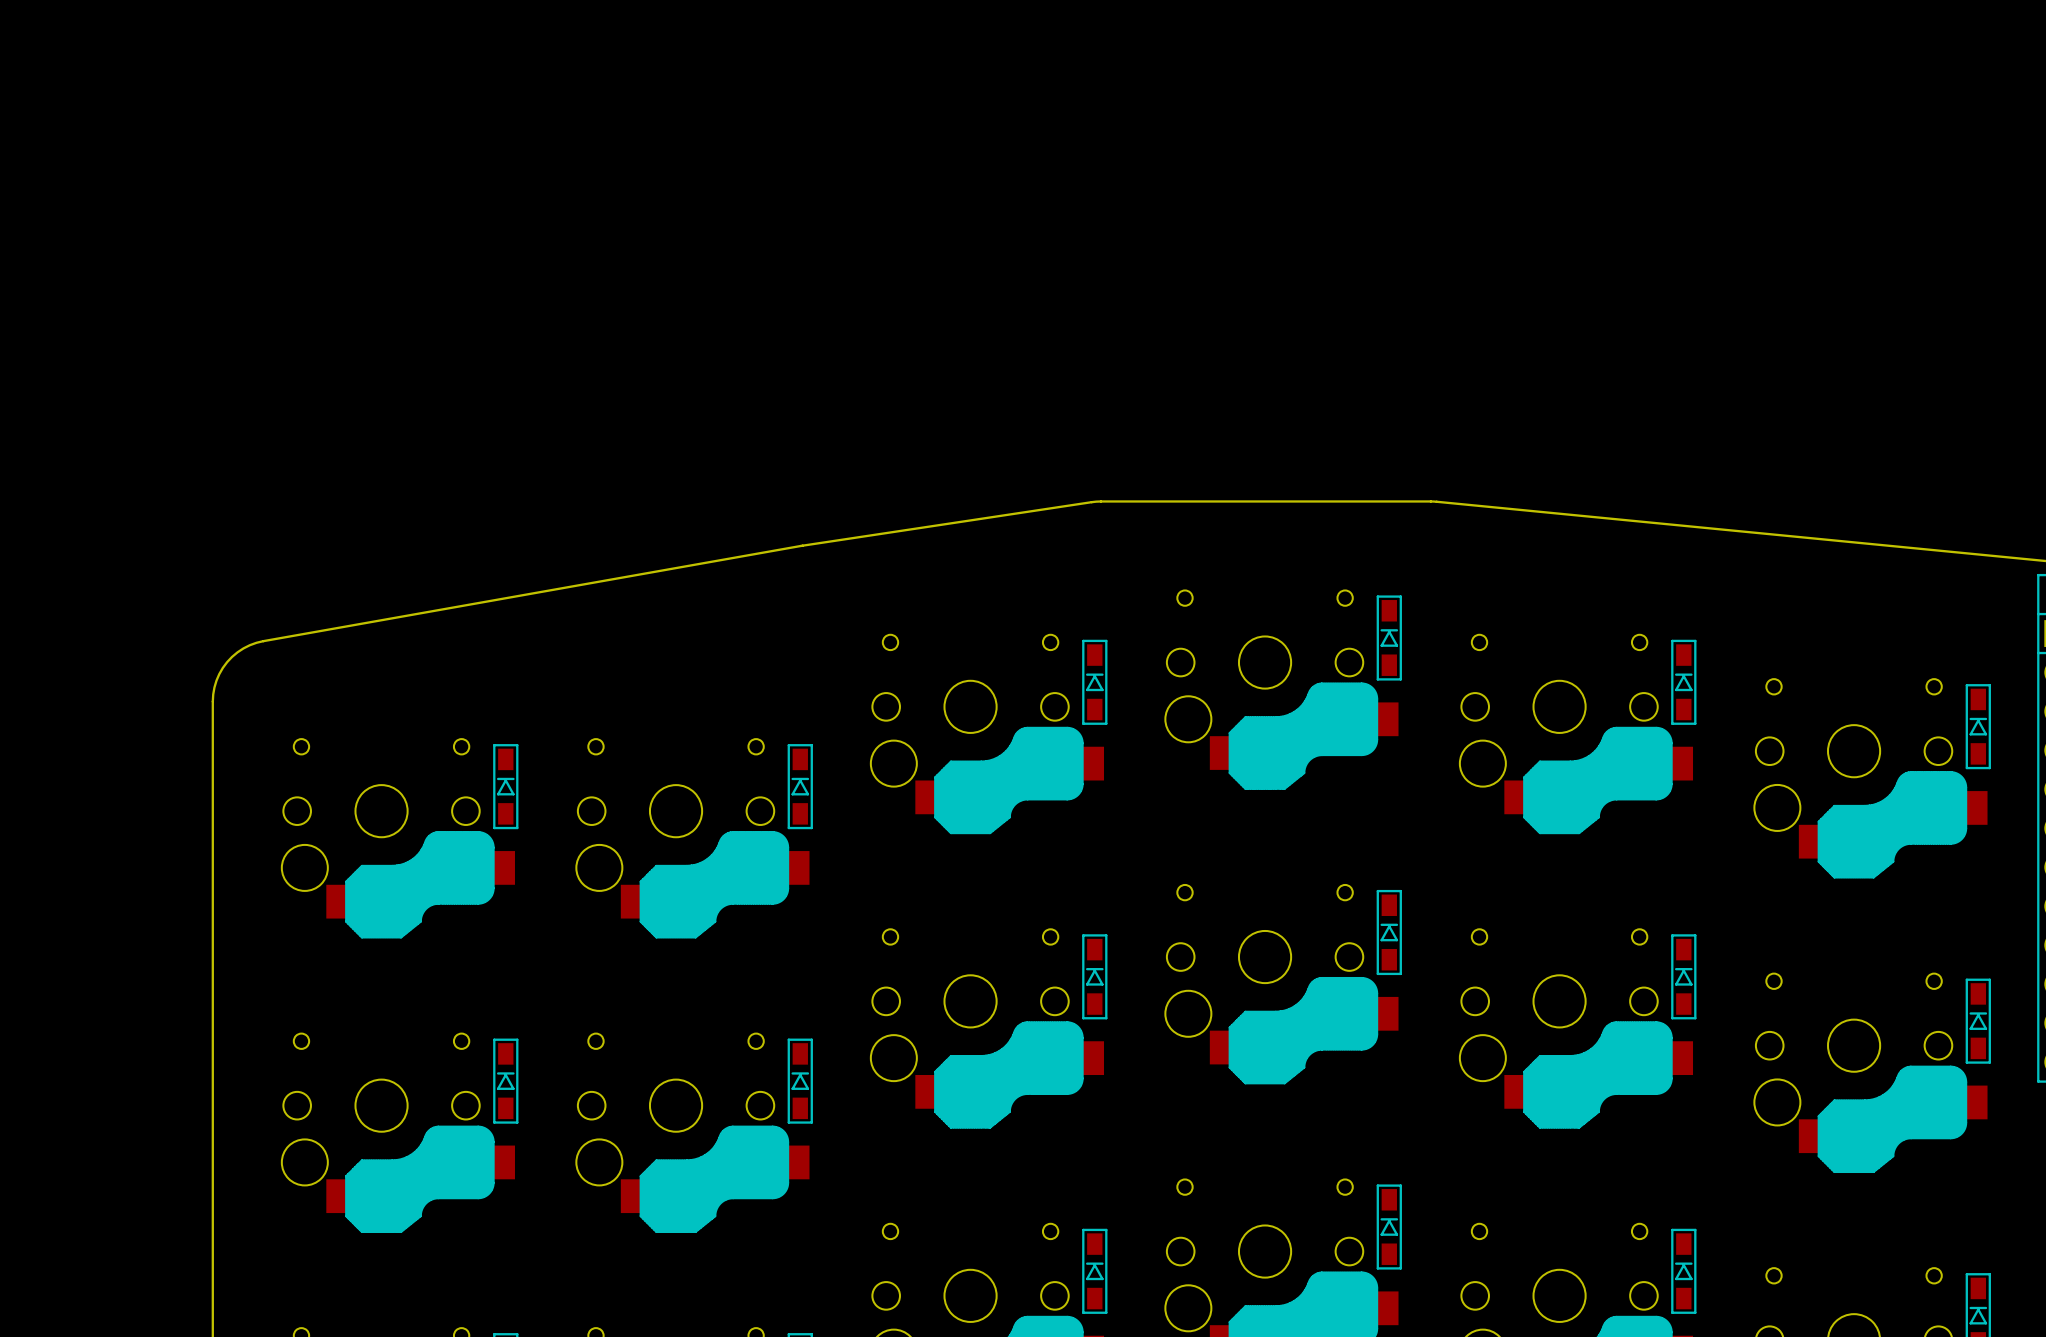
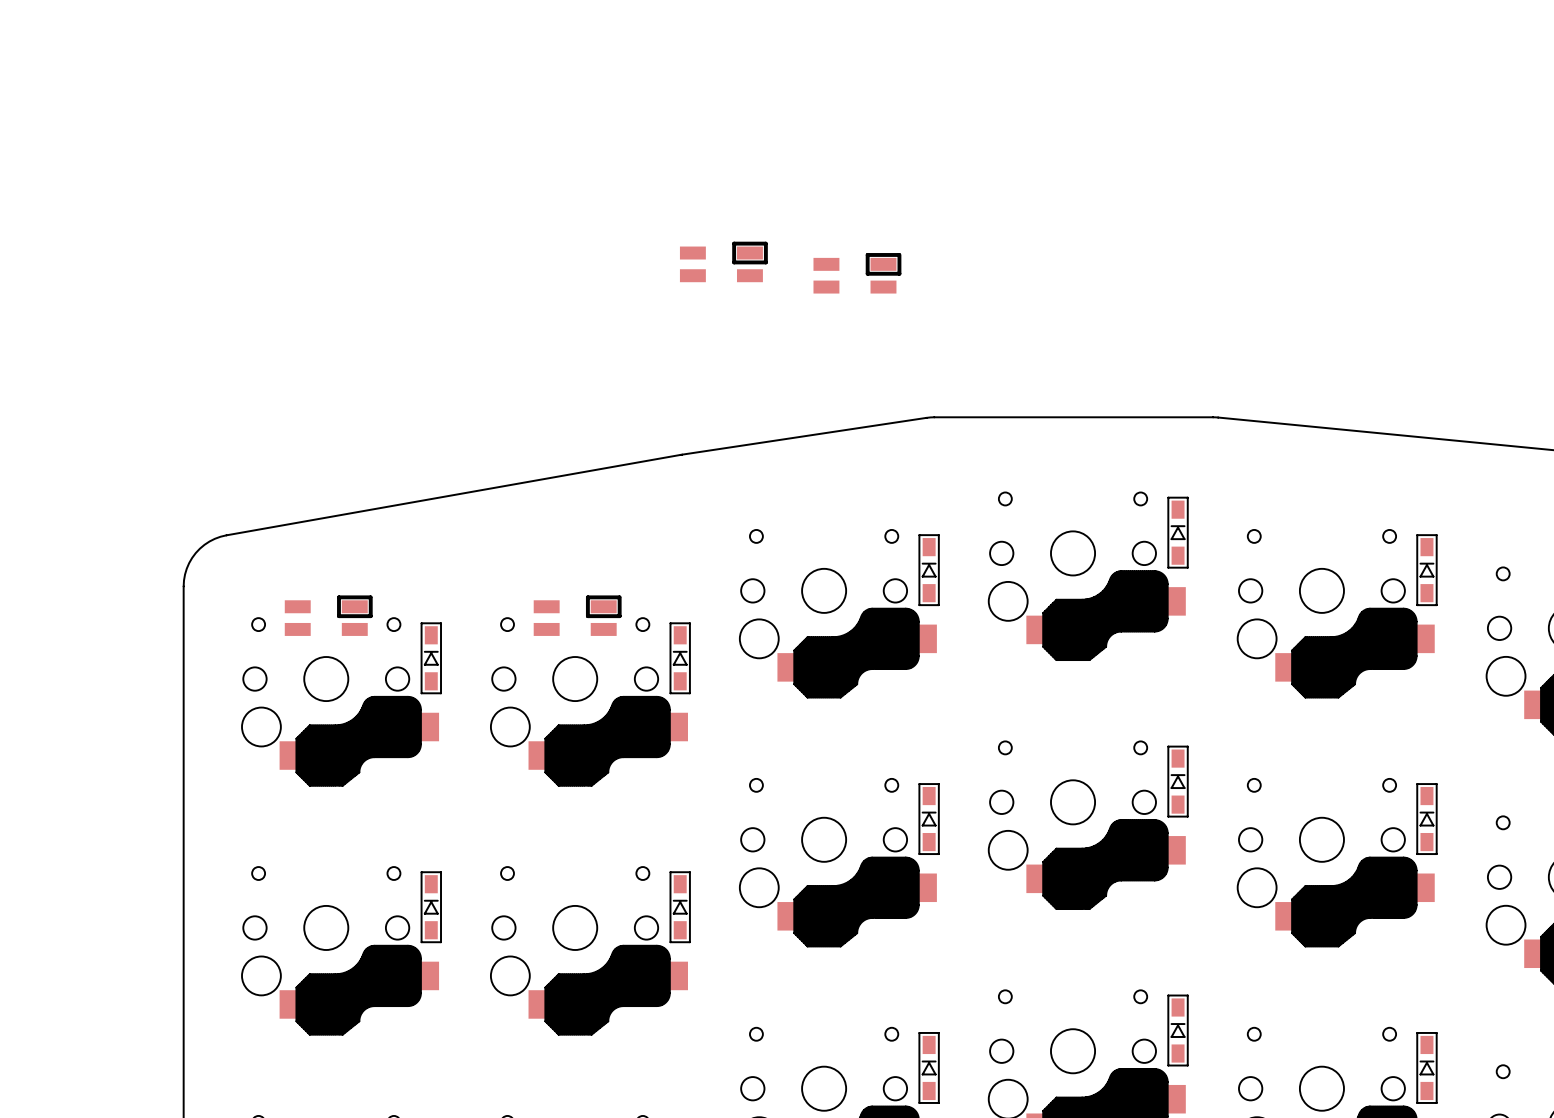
part: none -> (723, 261)
part: none -> (857, 273)
part: none -> (328, 615)
part: none -> (577, 615)

